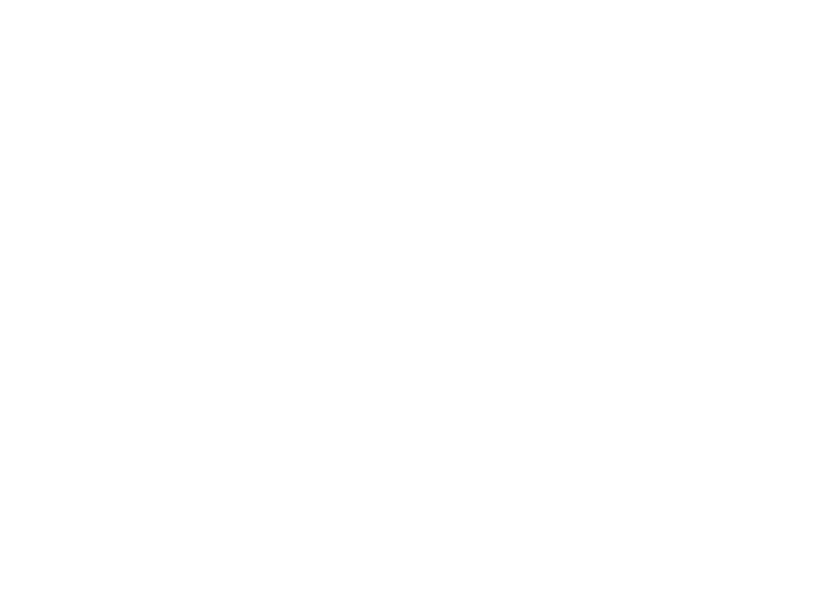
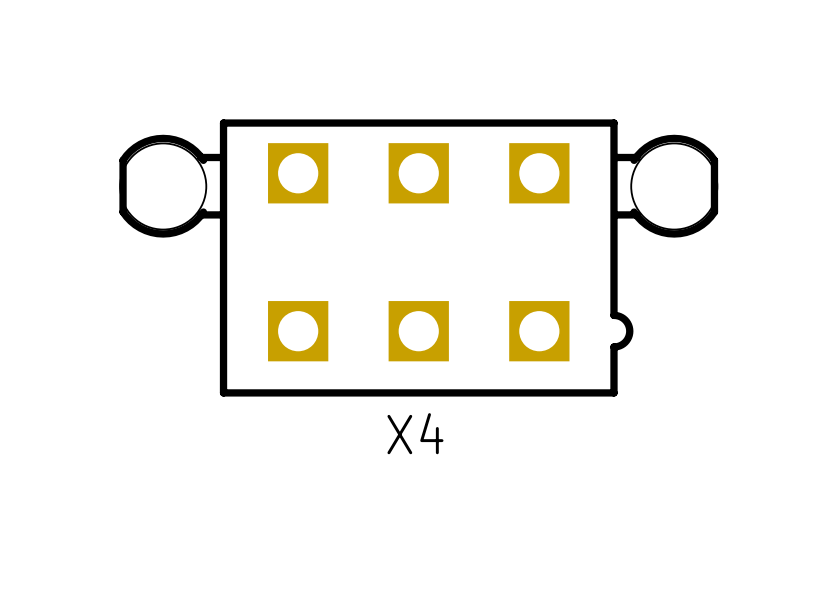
X4: none -> (418, 257)

